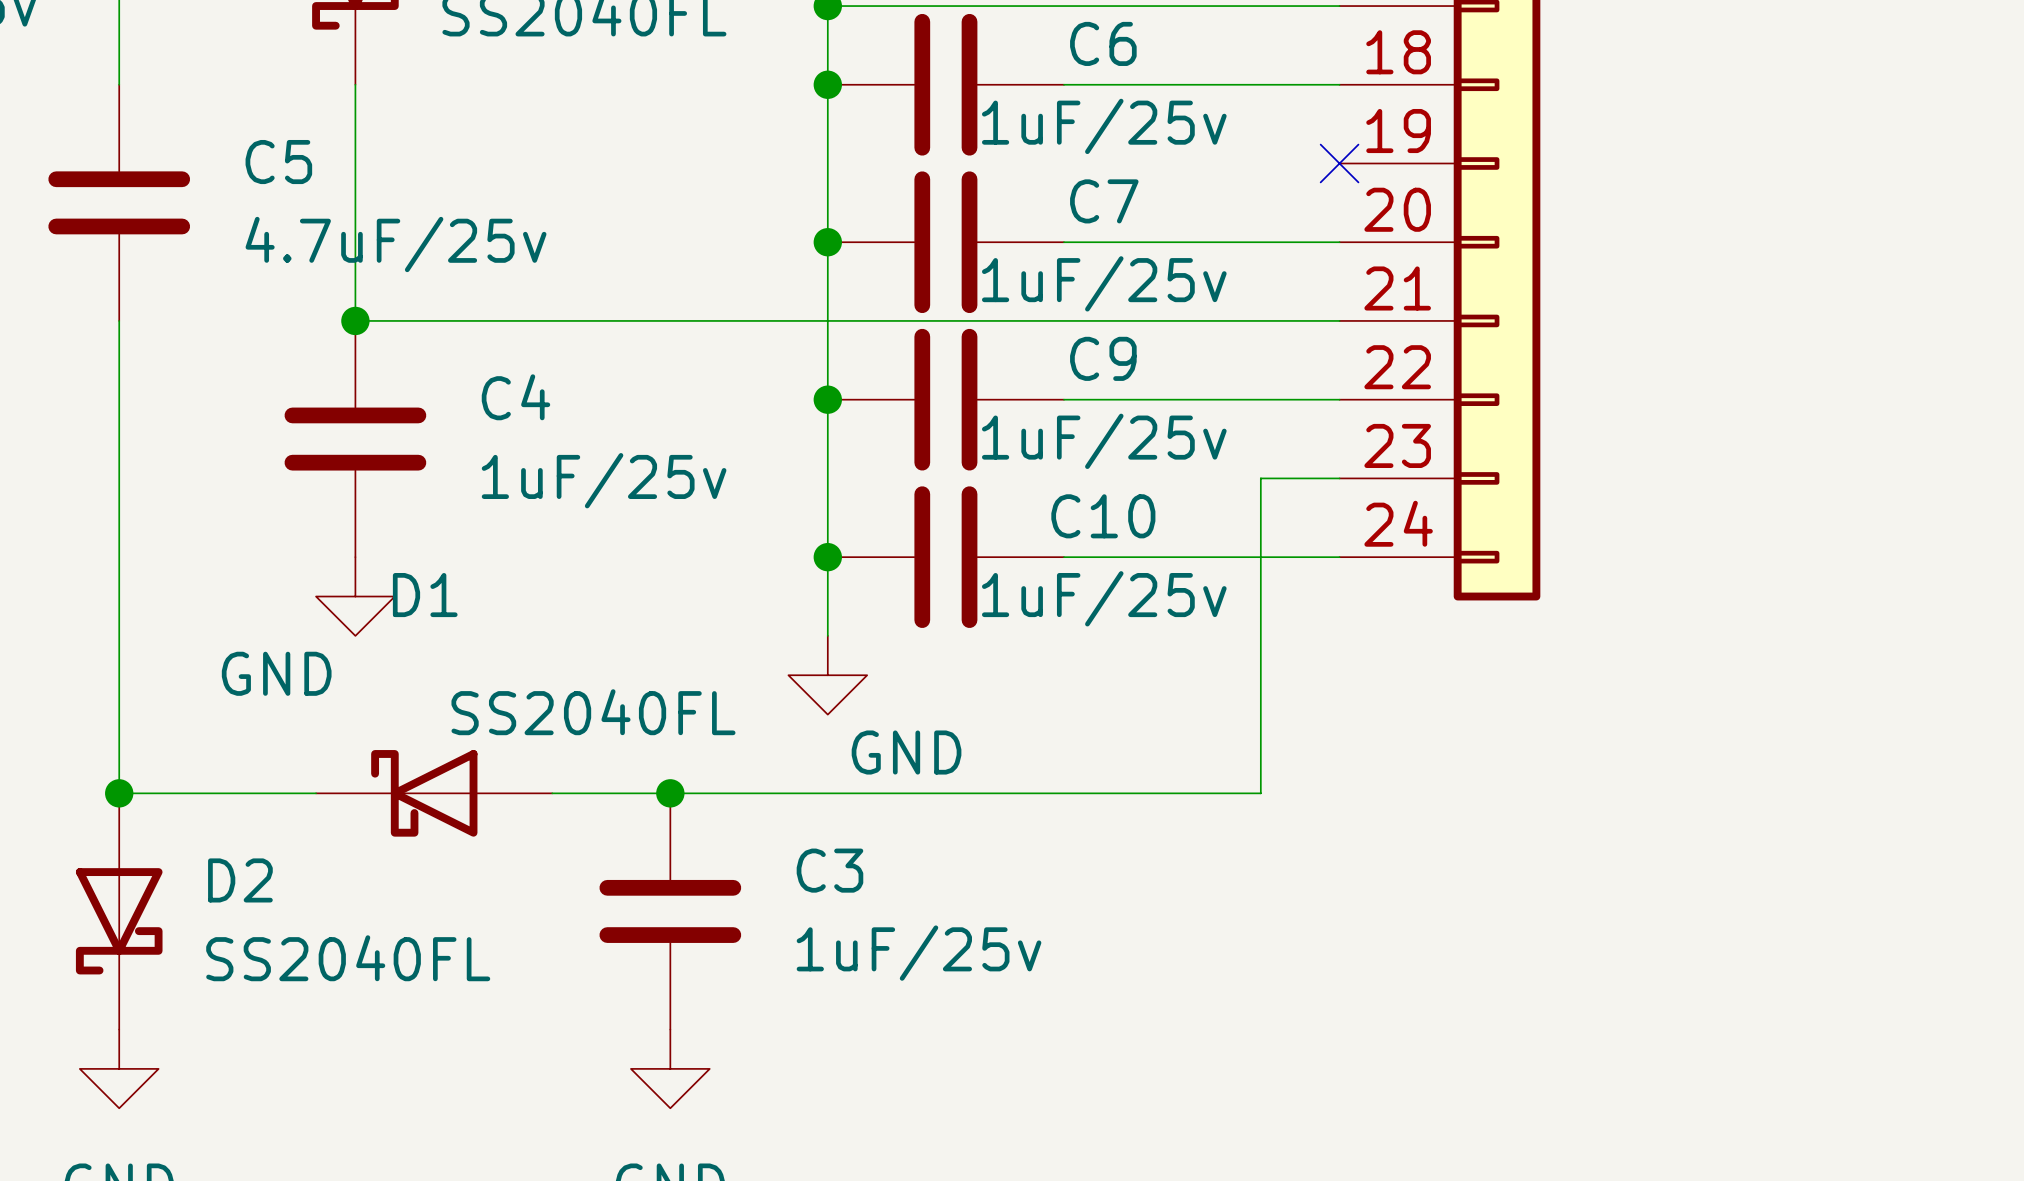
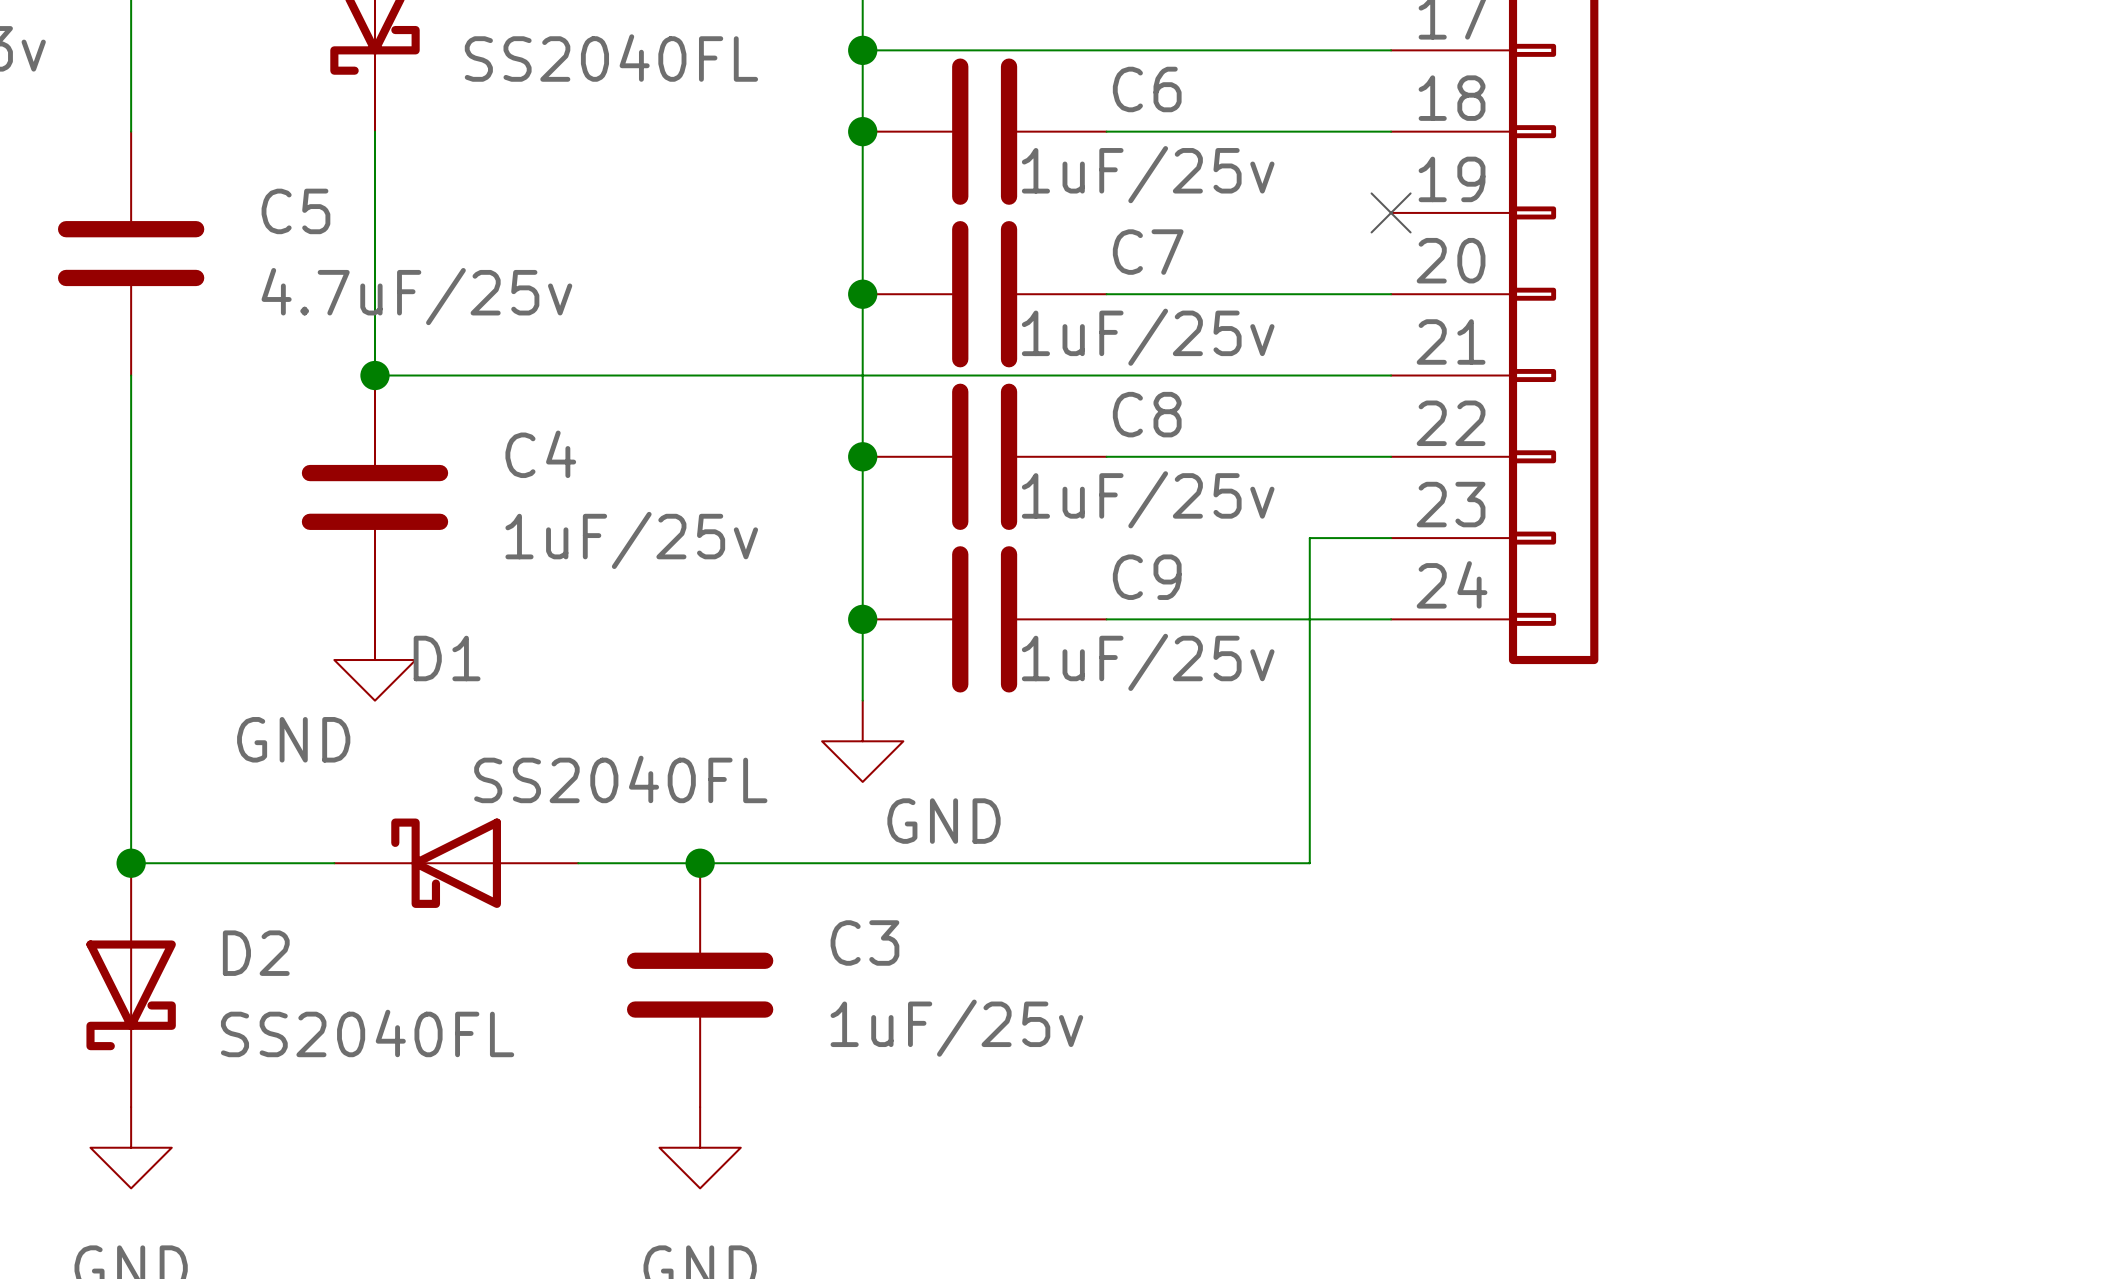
C9 name: C9 (1103, 358) -> C8 (1147, 414)
C10 name: C10 (1103, 516) -> C9 (1147, 577)

